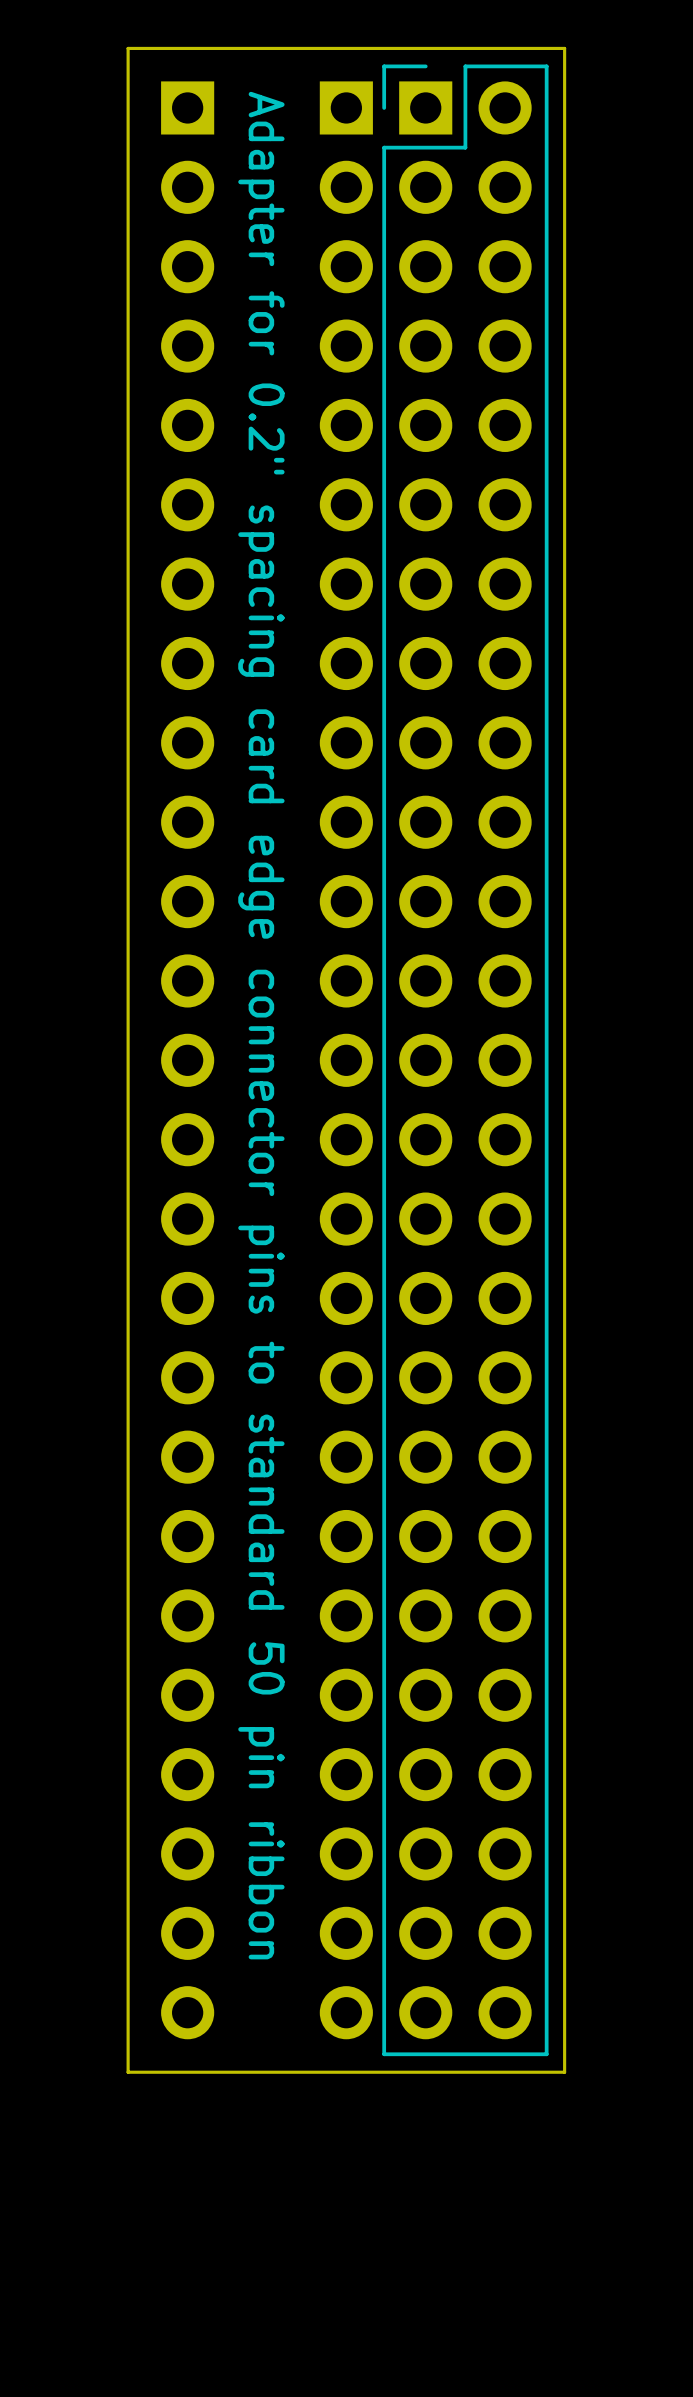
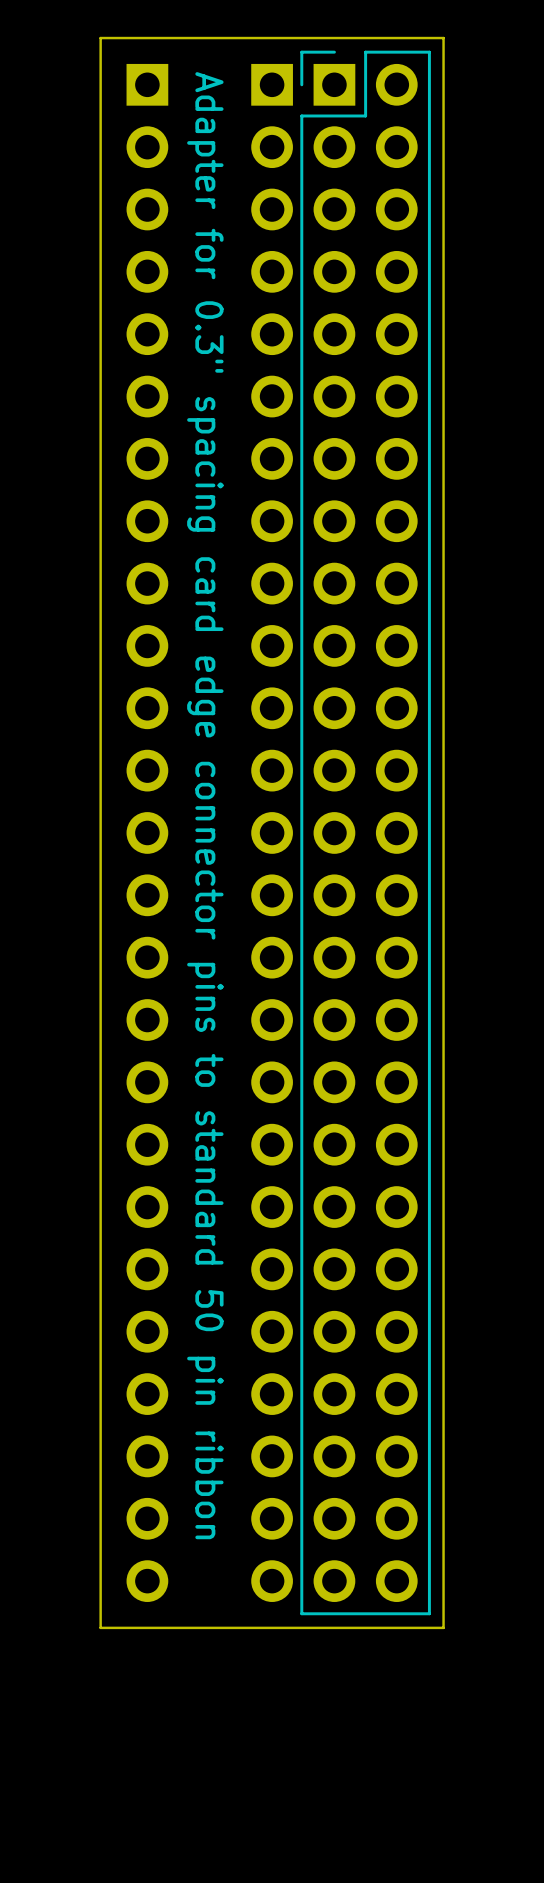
text: Adapter for 0.2" spacing card edge connector pins to standard 50 pin ribbon (261, 1025) -> Adapter for 0.3" spacing card edge connector pins to standard 50 pin ribbon (205, 805)

